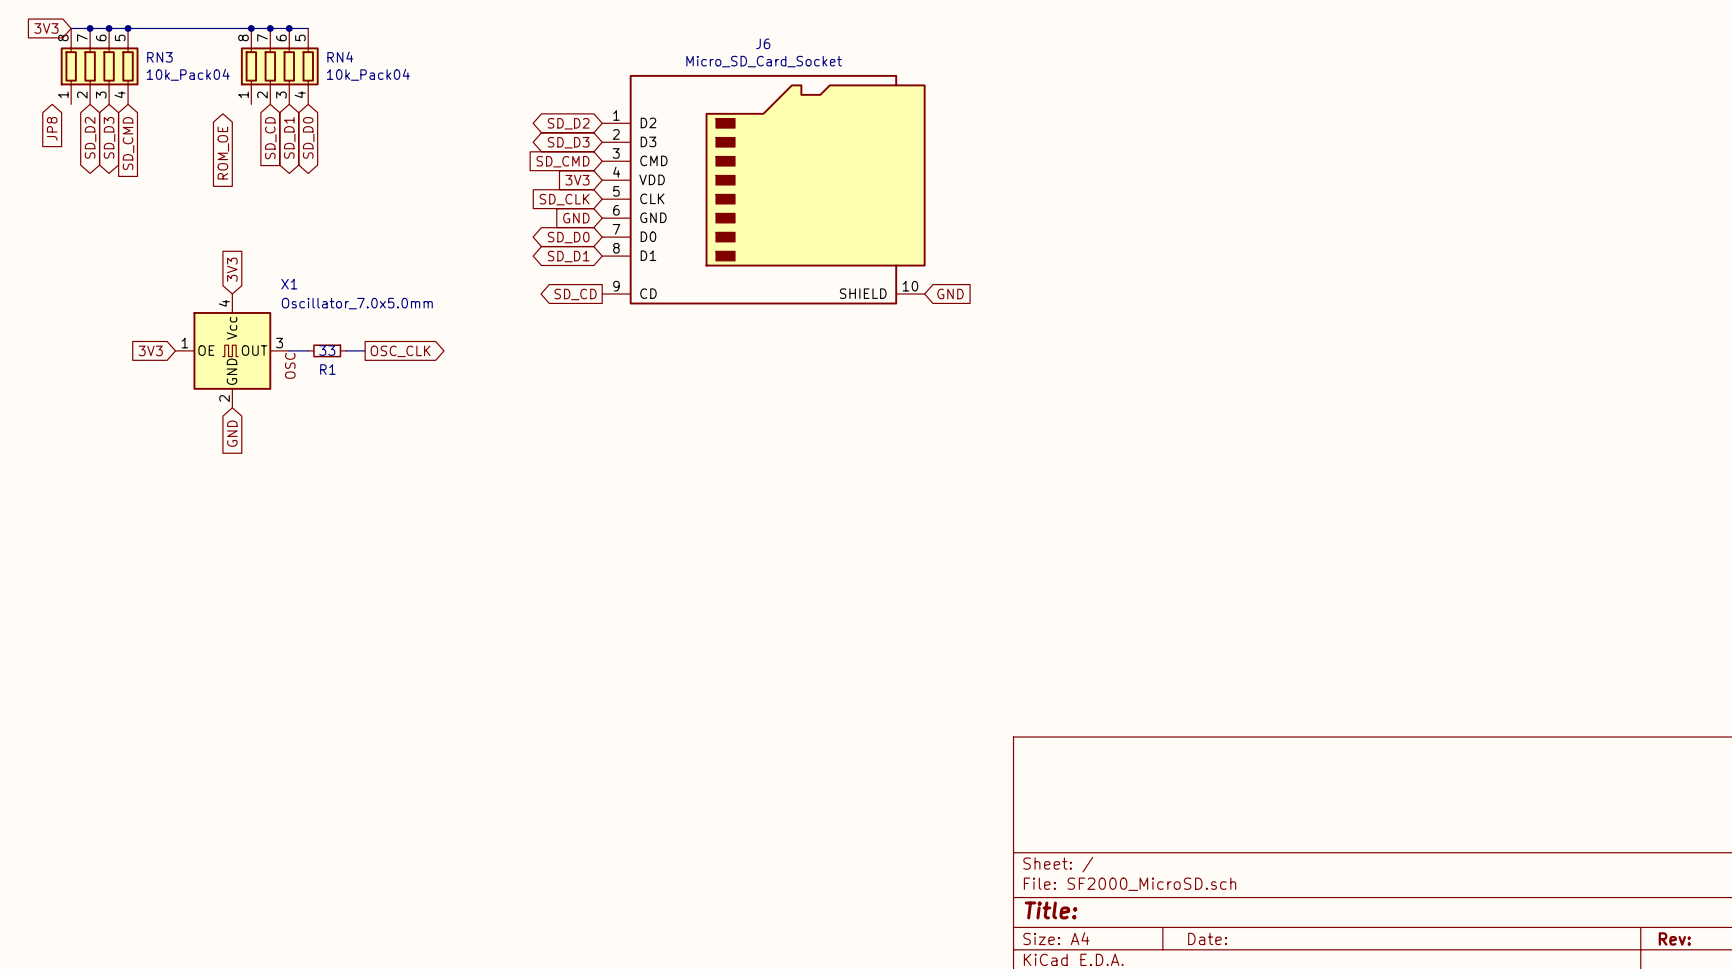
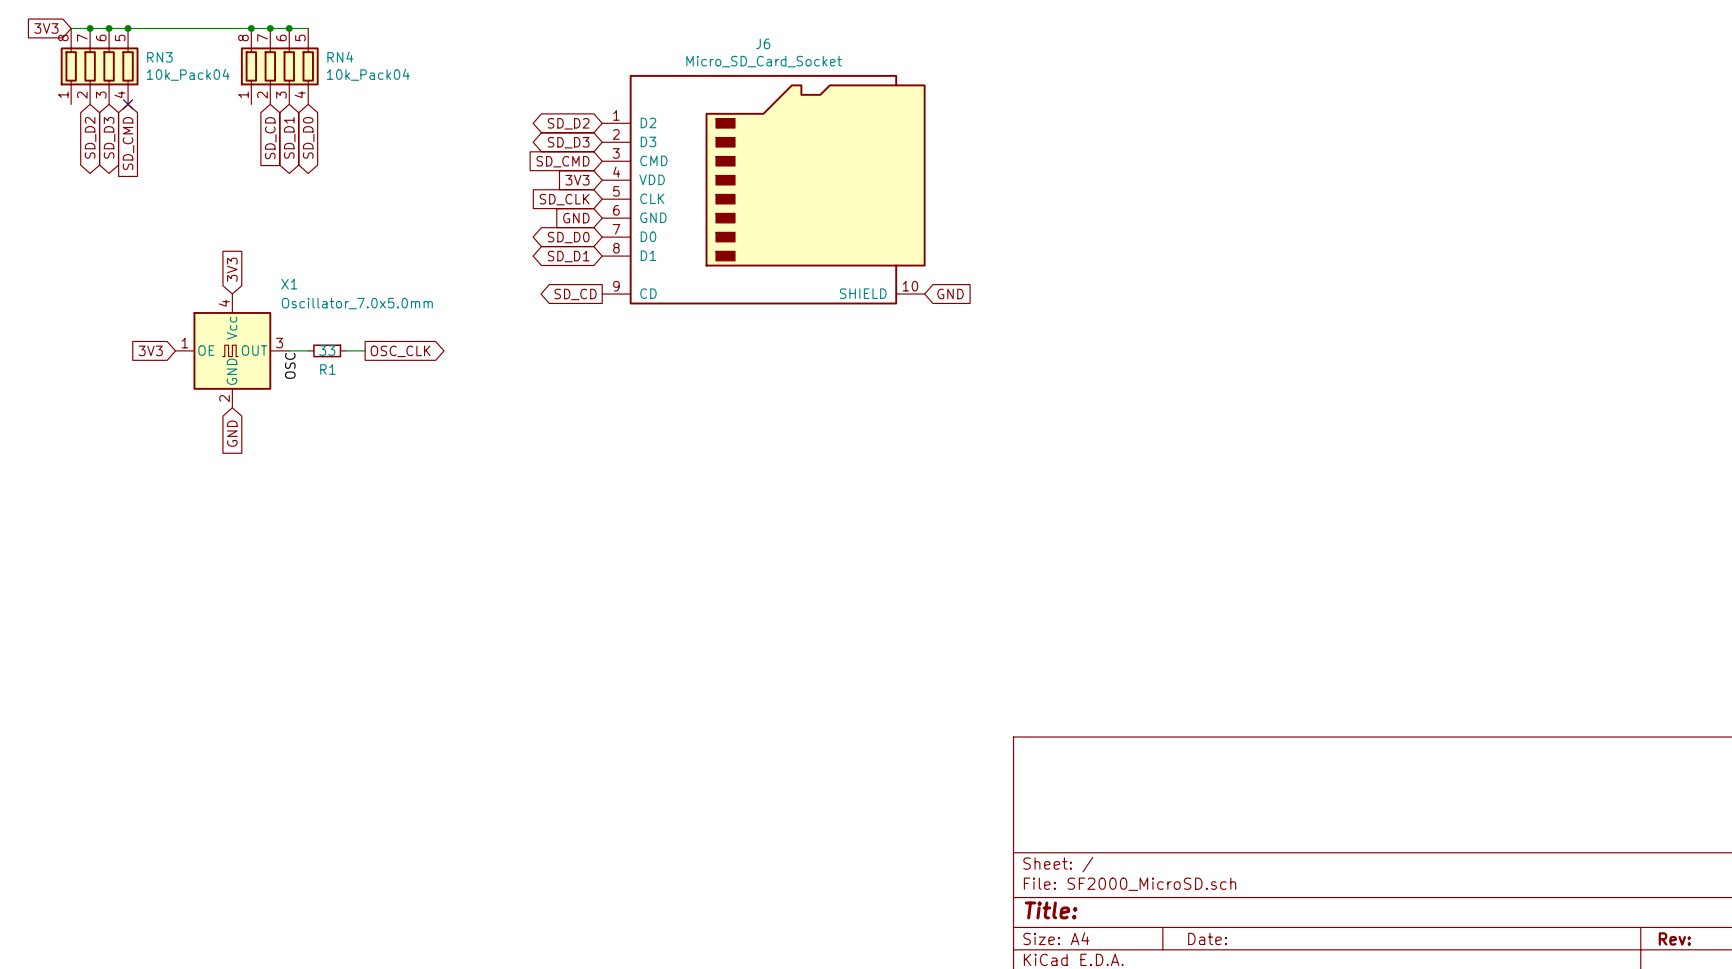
no-connect mark: none -> (128, 104)
global label: JP8 (52, 128) -> none
global label: ROM_OE (223, 153) -> none

